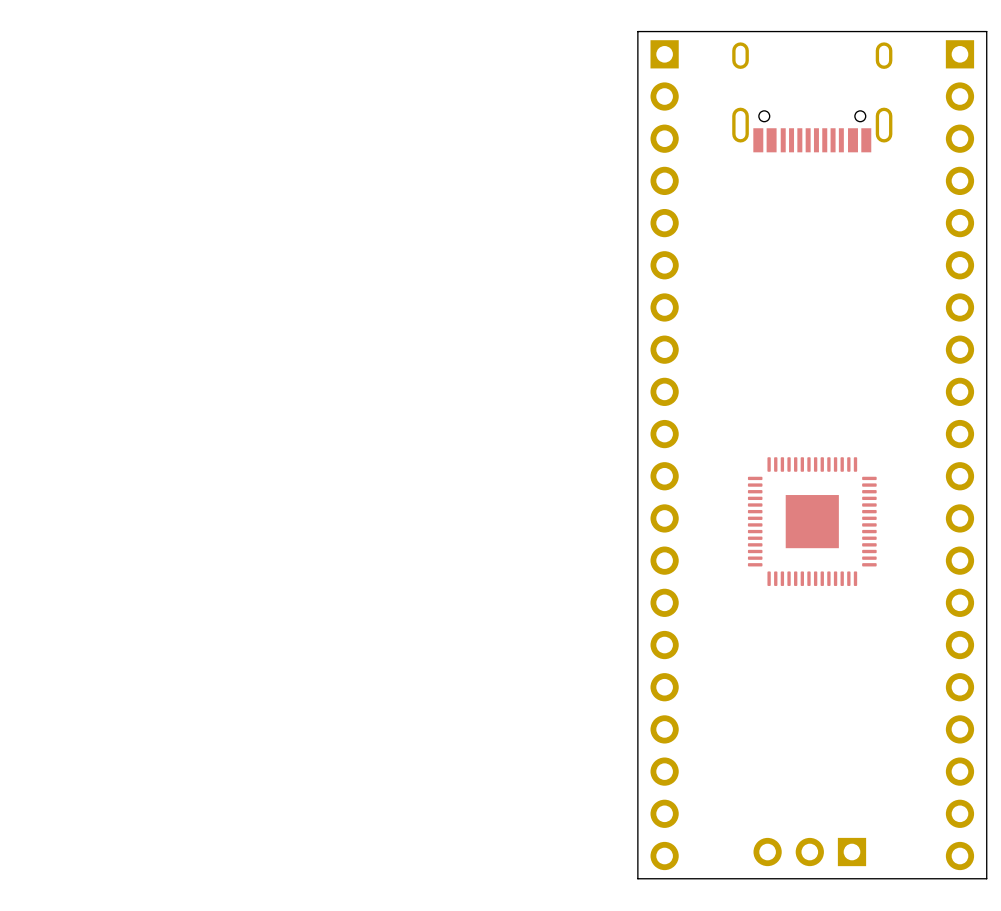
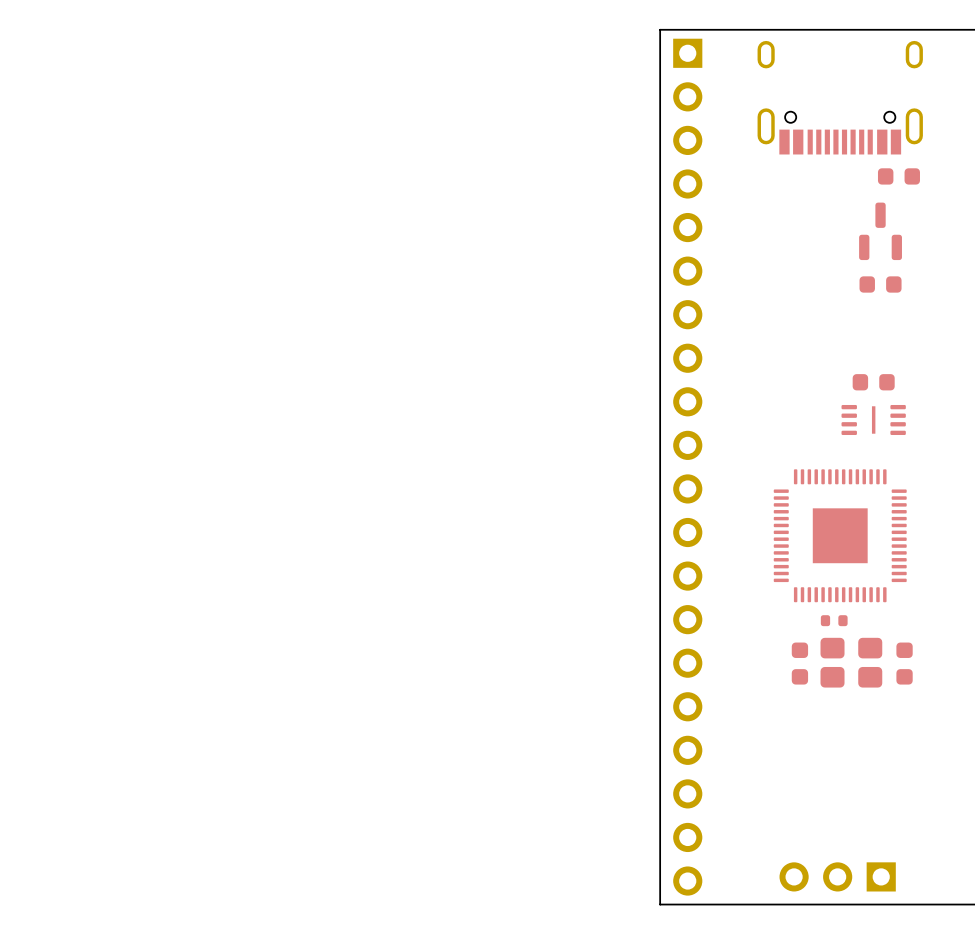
part: none -> (898, 176)
part: none -> (880, 231)
part: none -> (880, 284)
part: none -> (873, 382)
part: none -> (873, 419)
part: none -> (834, 620)
part: none -> (851, 662)
part: none -> (799, 663)
part: none -> (904, 663)

